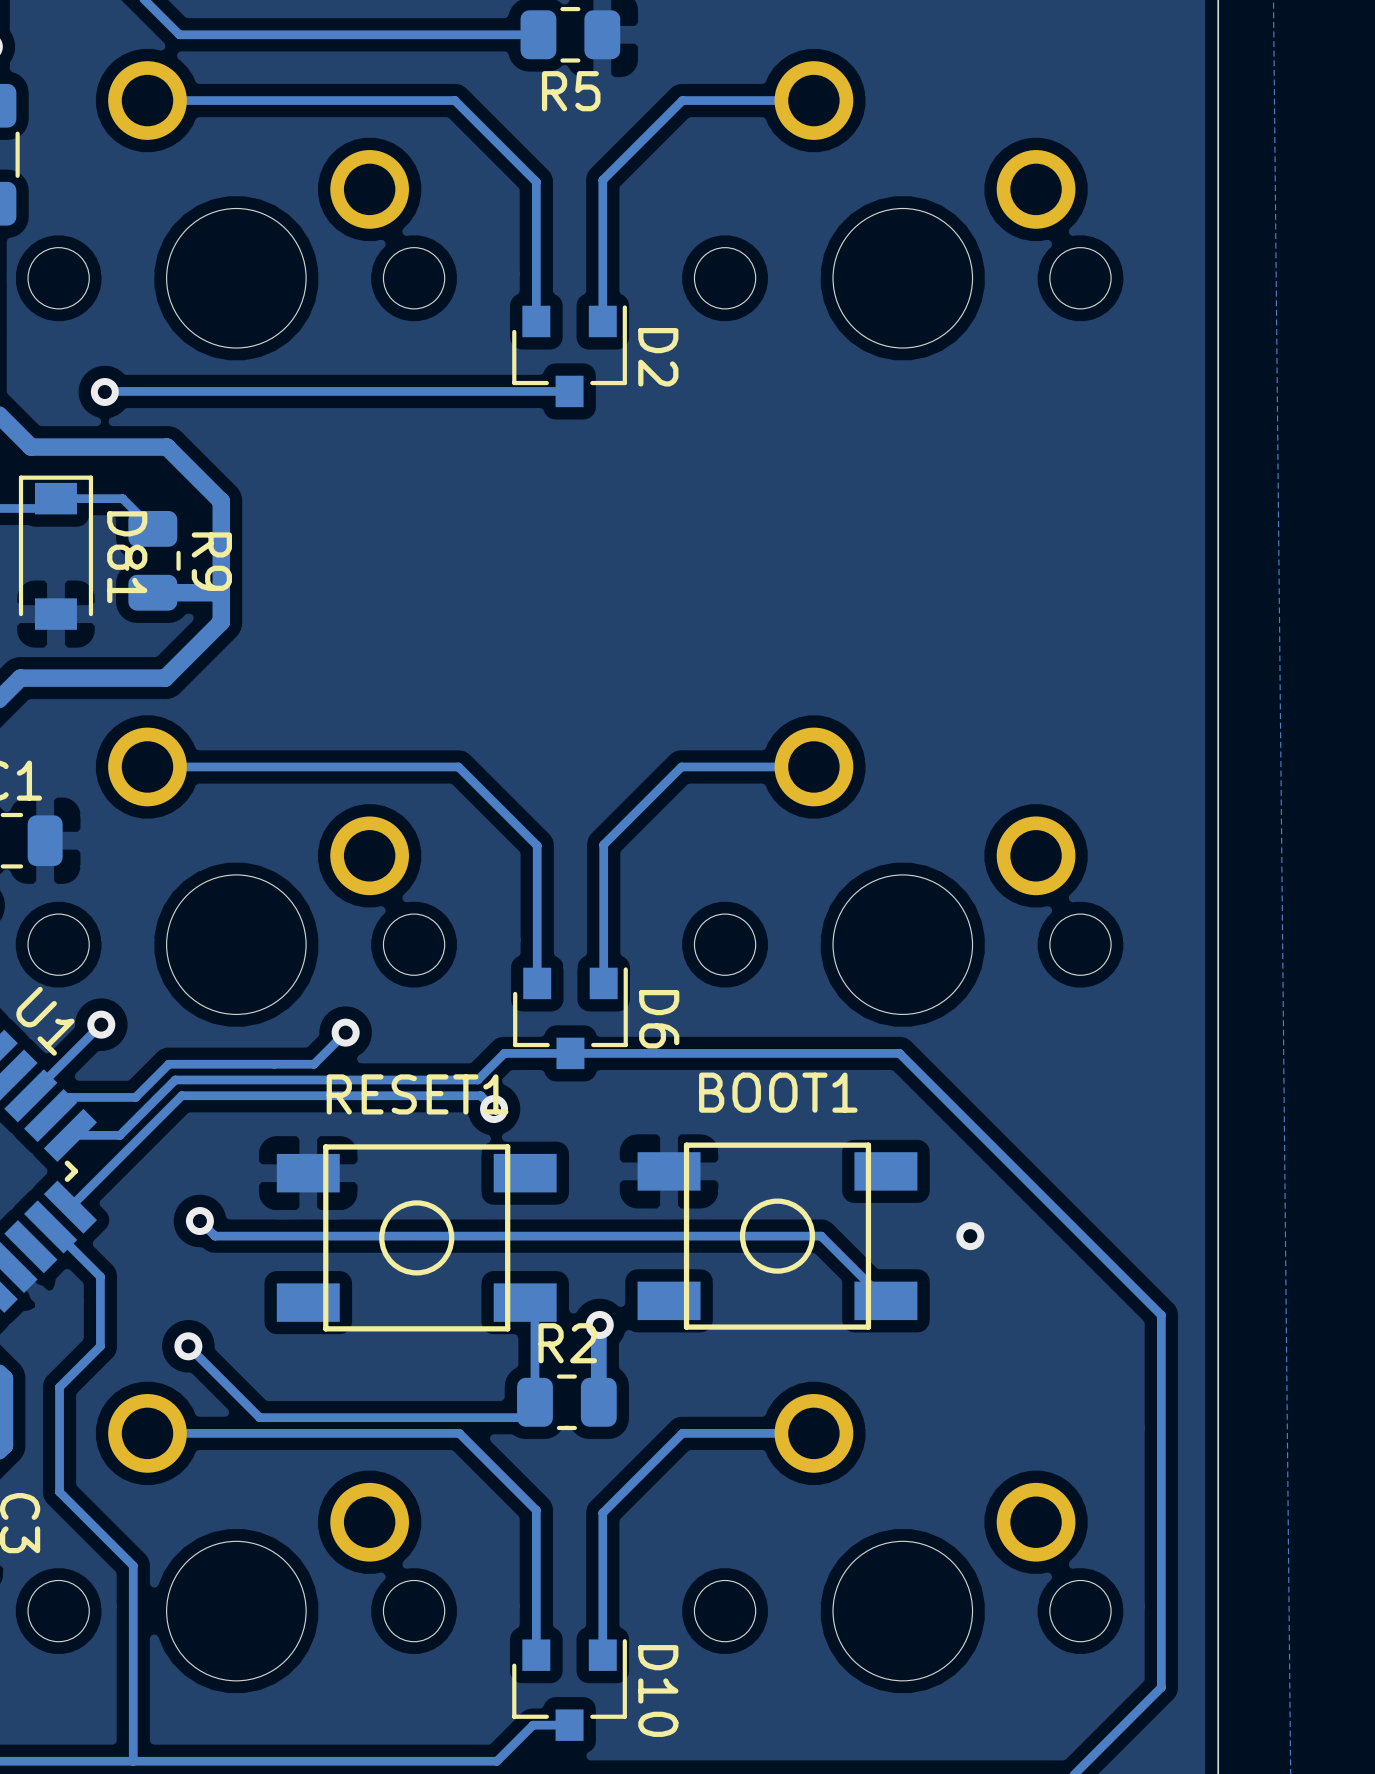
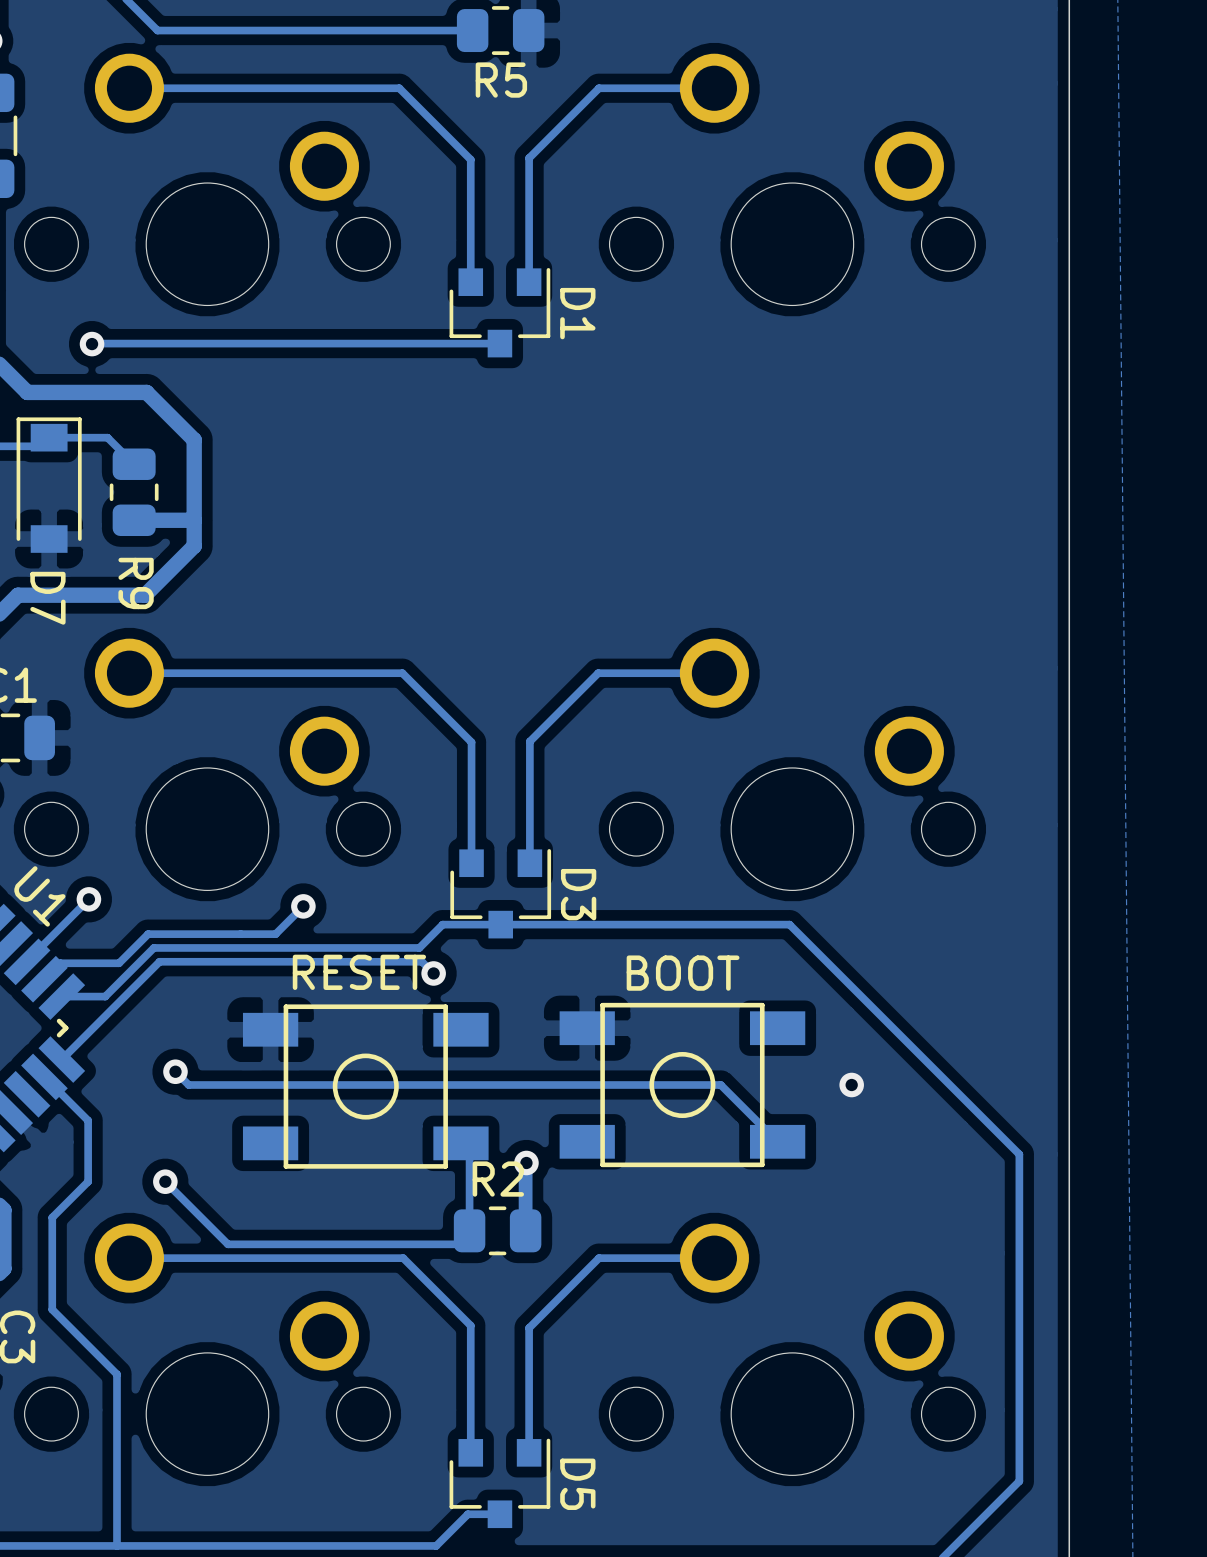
D2 name: D2 (658, 357) -> D1 (577, 313)
D81 name: D81 (127, 557) -> D7 (47, 598)
R9 name position: R9 (211, 561) -> R9 (136, 583)
D6 name: D6 (659, 1019) -> D3 (578, 894)
BOOT1 name: BOOT1 (778, 1092) -> BOOT (683, 973)
RESET1 name: RESET1 (417, 1094) -> RESET (359, 972)
D10 name: D10 (658, 1691) -> D5 (577, 1484)

